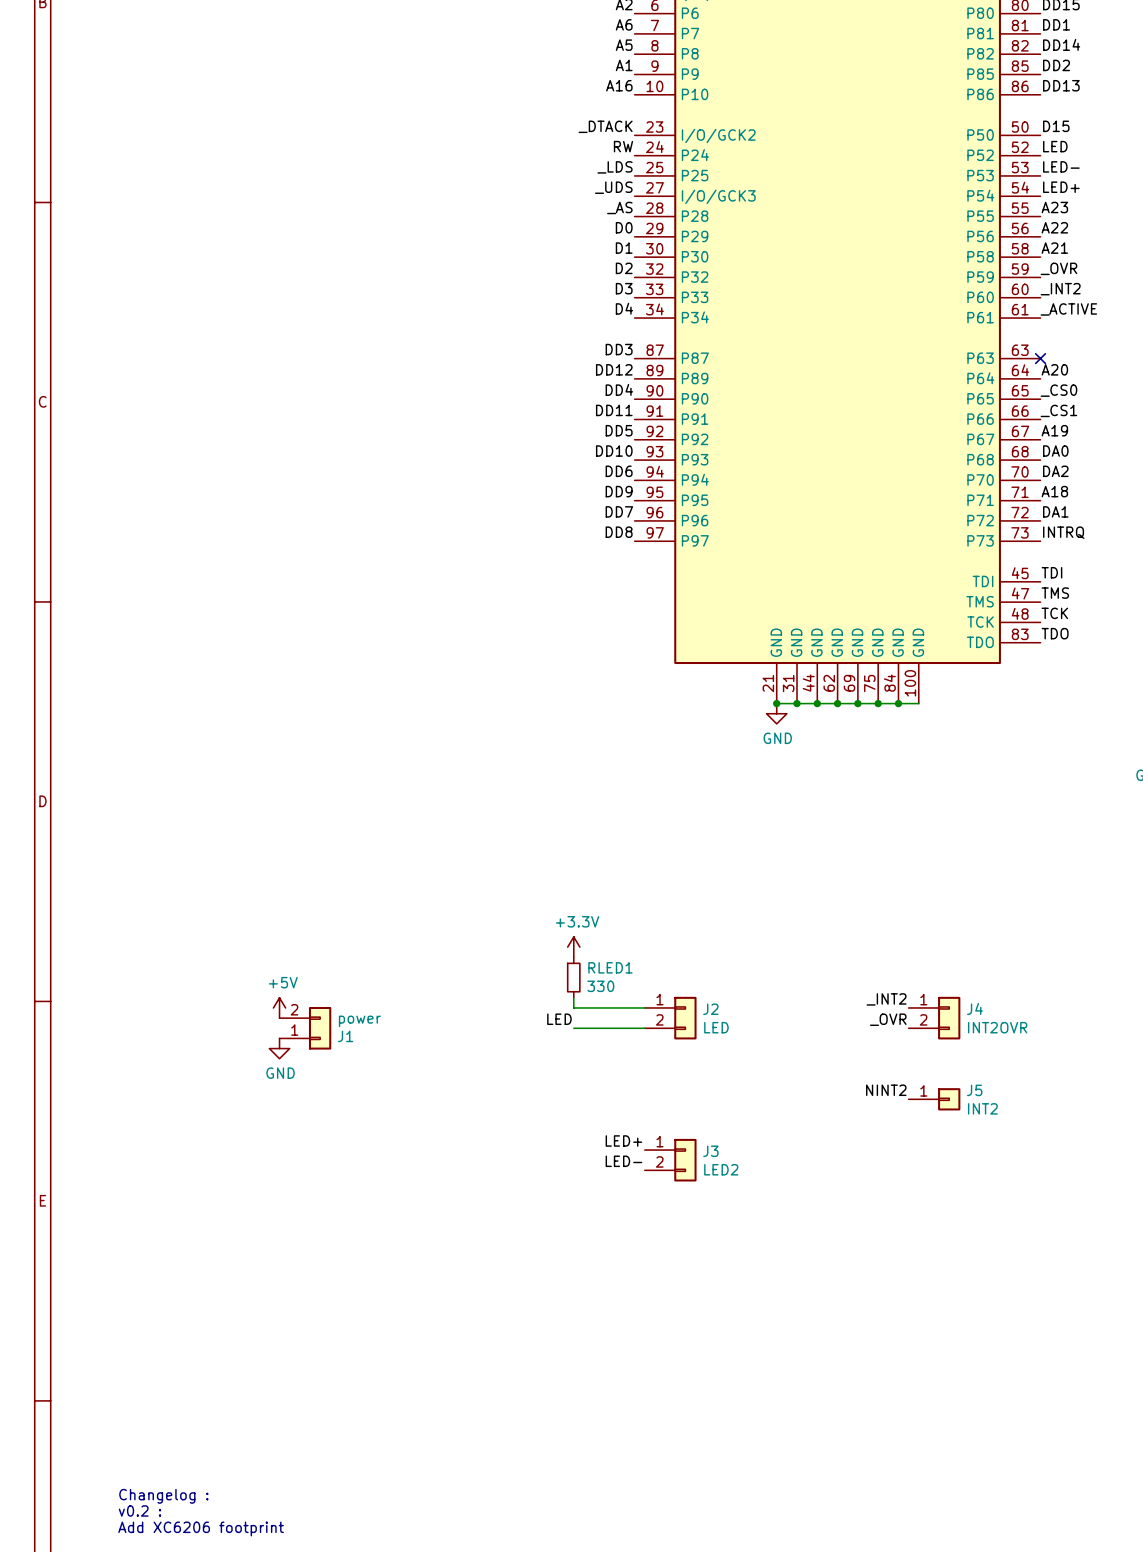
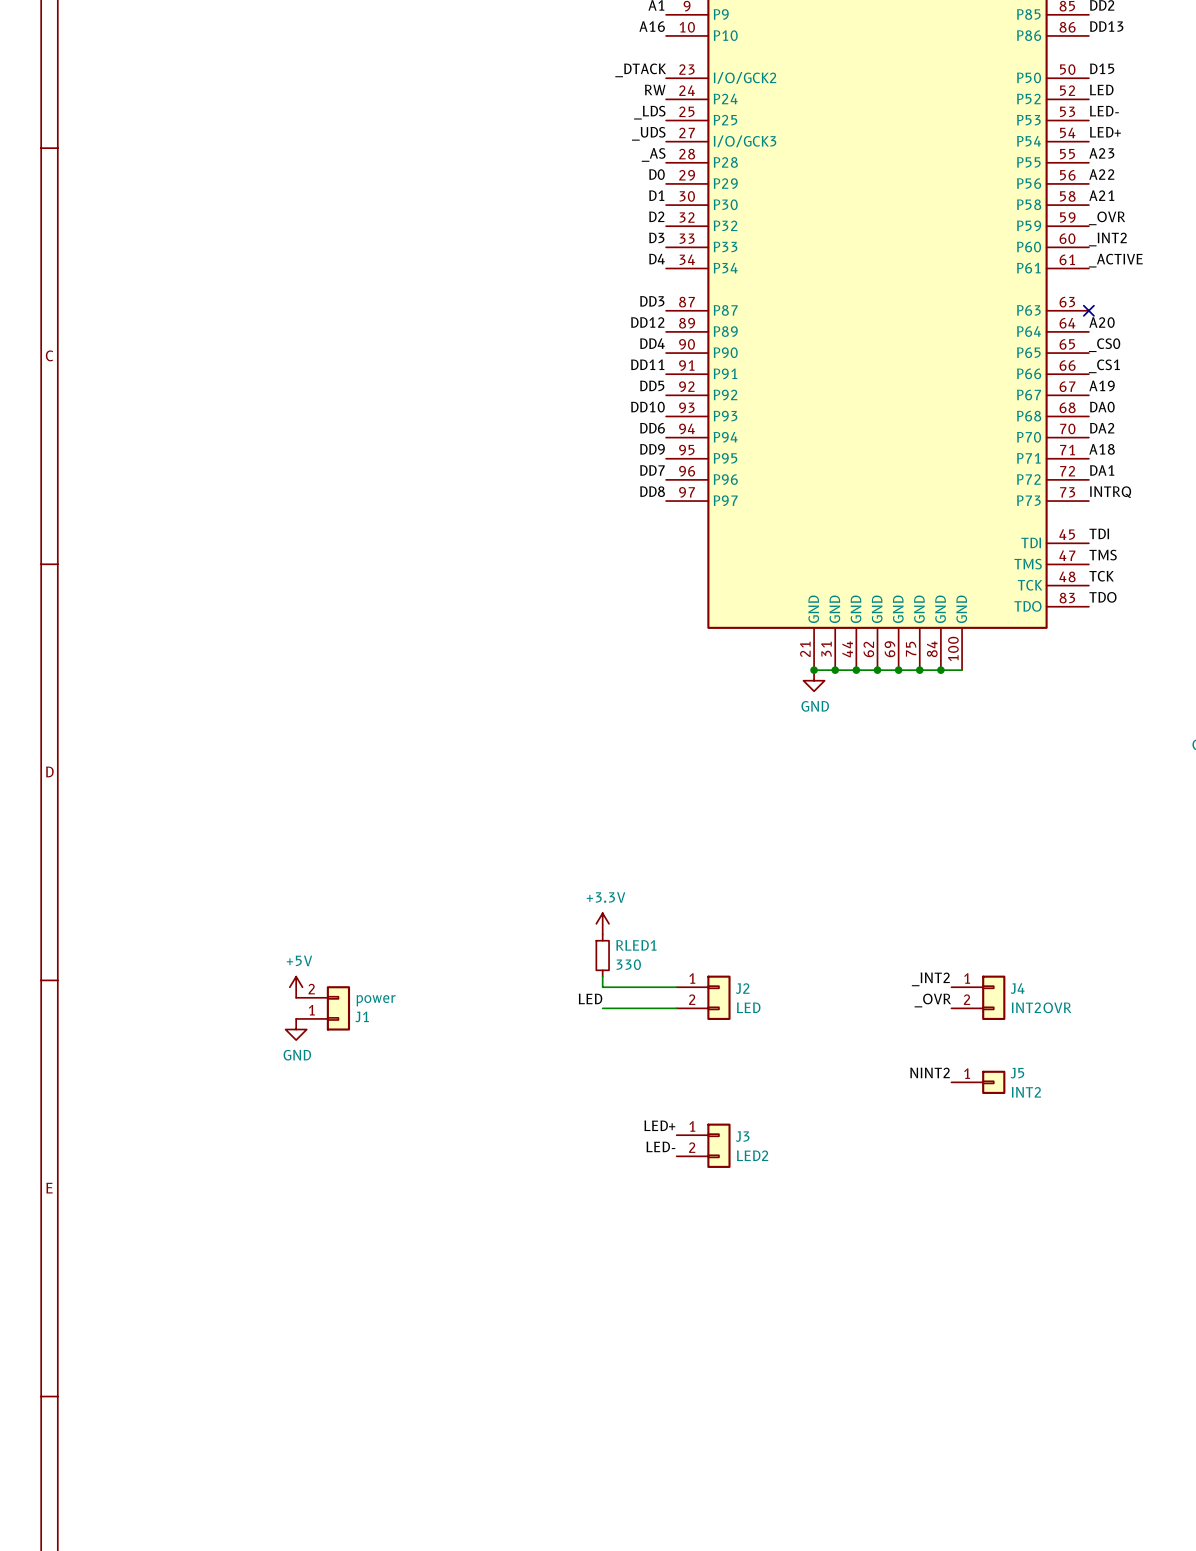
text: Changelog : (163, 1496) -> none
text: v0.2 : (139, 1510) -> none
text: Add XC6206 footprint (201, 1528) -> none

